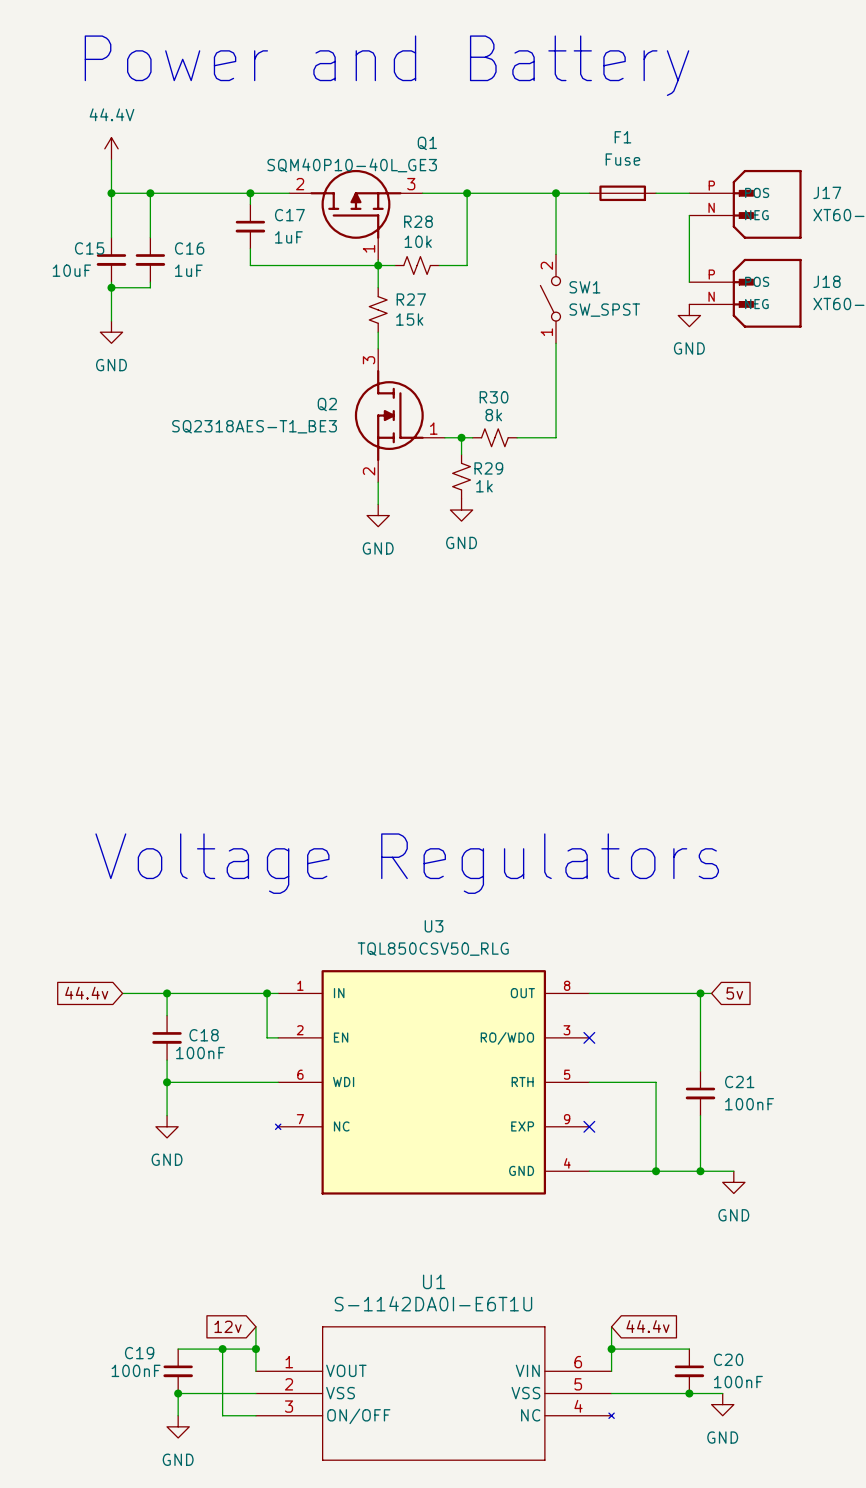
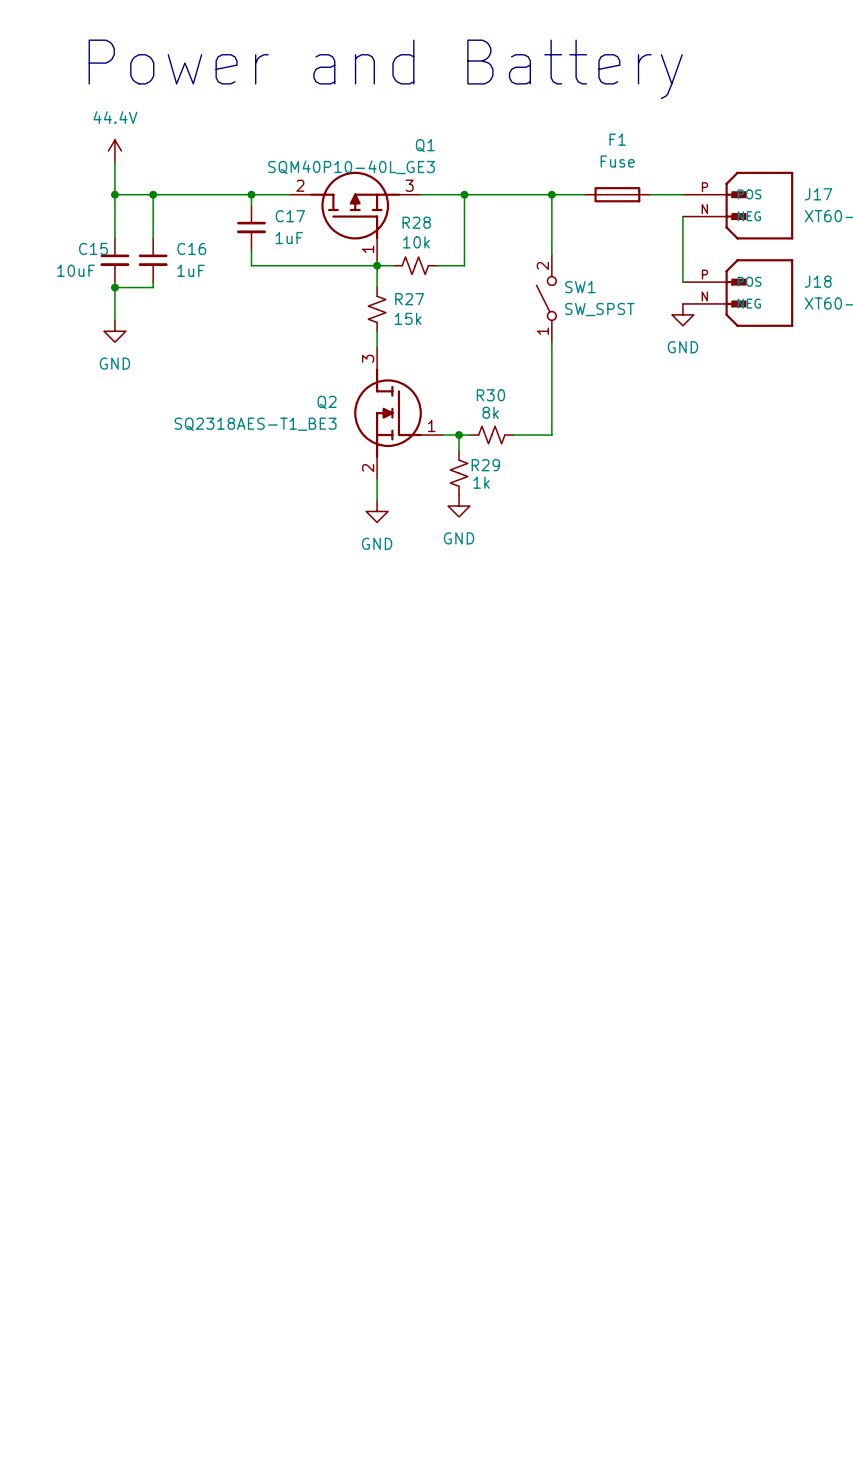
text: Voltage Regulators (407, 863) -> none
global label: 44.4v (86, 993) -> none
wire: (122, 993) (278, 993) -> none
wire: (167, 993) (167, 1015) -> none
junction: (167, 993) -> none
wire: (267, 993) (267, 1037) (278, 1037) -> none
junction: (267, 993) -> none
wire: (589, 993) (711, 993) -> none
wire: (700, 993) (700, 1071) -> none
junction: (700, 993) -> none
global label: 5v (734, 993) -> none
C18: 100nF (167, 1037) -> none
no-connect mark: (589, 1037) -> none
wire: (167, 1060) (167, 1115) -> none
wire: (167, 1082) (278, 1082) -> none
junction: (167, 1082) -> none
U3: TQL850CSV50_RLG (432, 1082) -> none
wire: (589, 1082) (656, 1082) (656, 1171) -> none
C21: 100nF (700, 1093) -> none
wire: (700, 1115) (700, 1171) -> none
power symbol: GND (167, 1126) -> none
no-connect mark: (589, 1126) -> none
wire: (589, 1171) (733, 1171) -> none
junction: (656, 1171) -> none
junction: (700, 1171) -> none
power symbol: GND (733, 1182) -> none
global label: 12v (228, 1326) -> none
wire: (255, 1326) (255, 1371) -> none
wire: (611, 1326) (611, 1371) -> none
global label: 44.4v (647, 1326) -> none
wire: (178, 1349) (255, 1349) -> none
wire: (222, 1349) (222, 1415) (255, 1415) -> none
junction: (222, 1349) -> none
junction: (255, 1349) -> none
wire: (611, 1349) (689, 1349) -> none
junction: (611, 1349) -> none
C19: 100nF (178, 1371) -> none
C20: 100nF (689, 1371) -> none
junction: (178, 1393) -> none
wire: (255, 1393) (178, 1393) (178, 1415) -> none
U1: S-1142DA0I-E6T1U (435, 1393) -> none
wire: (611, 1393) (722, 1393) -> none
junction: (689, 1393) -> none
power symbol: GND (722, 1404) -> none
power symbol: GND (178, 1426) -> none

